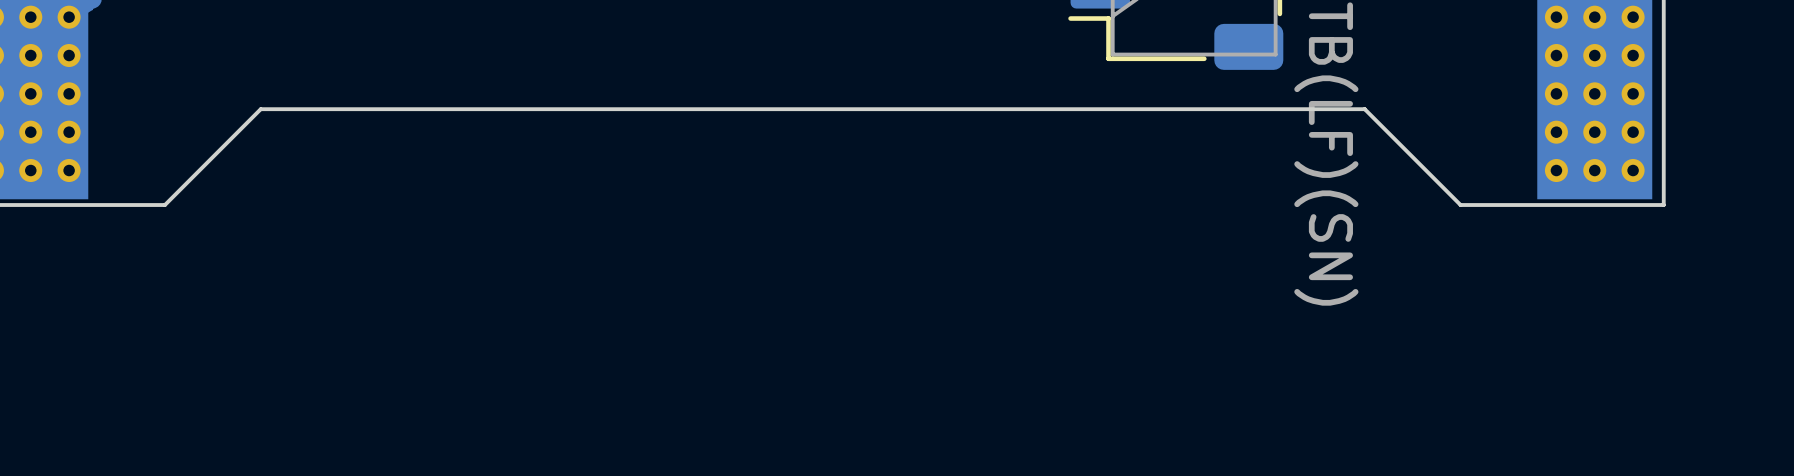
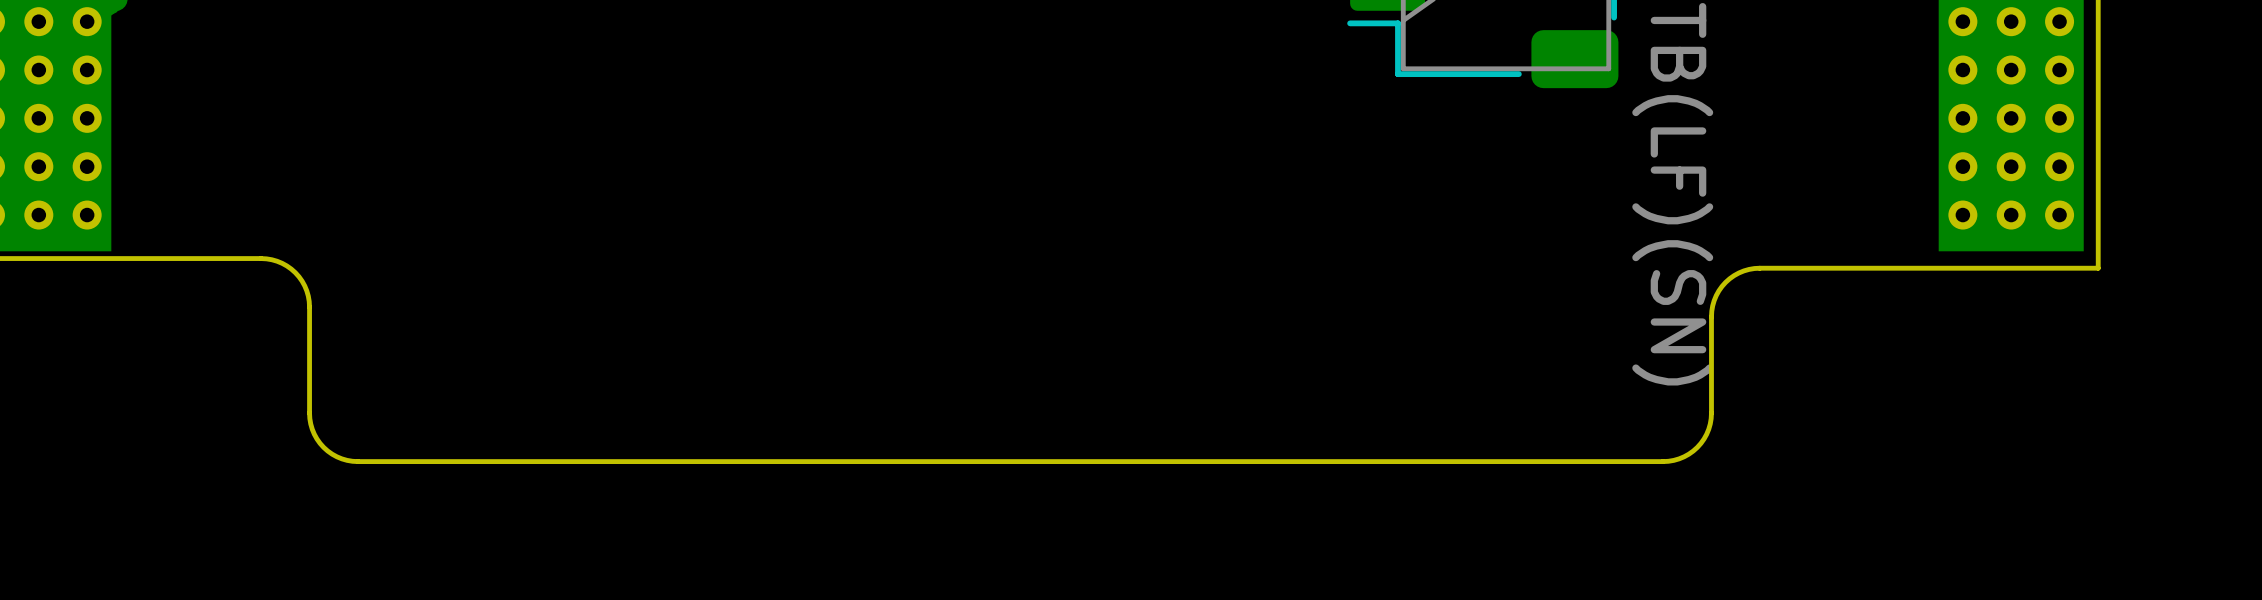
board edge: (1663, 205) (1460, 205) (1364, 109) (260, 109) (164, 205) -> (2098, 258) (2098, 268) (1759, 268) (1738, 273) (1722, 286) (1712, 305) (1711, 413) (1708, 429) (1704, 438) (1693, 451) (1679, 458) (1663, 461) (352, 461) (336, 456) (327, 451) (316, 438) (312, 429) (309, 413) (309, 301) (306, 290) (298, 276) (286, 265) (271, 259) (208, 258)

